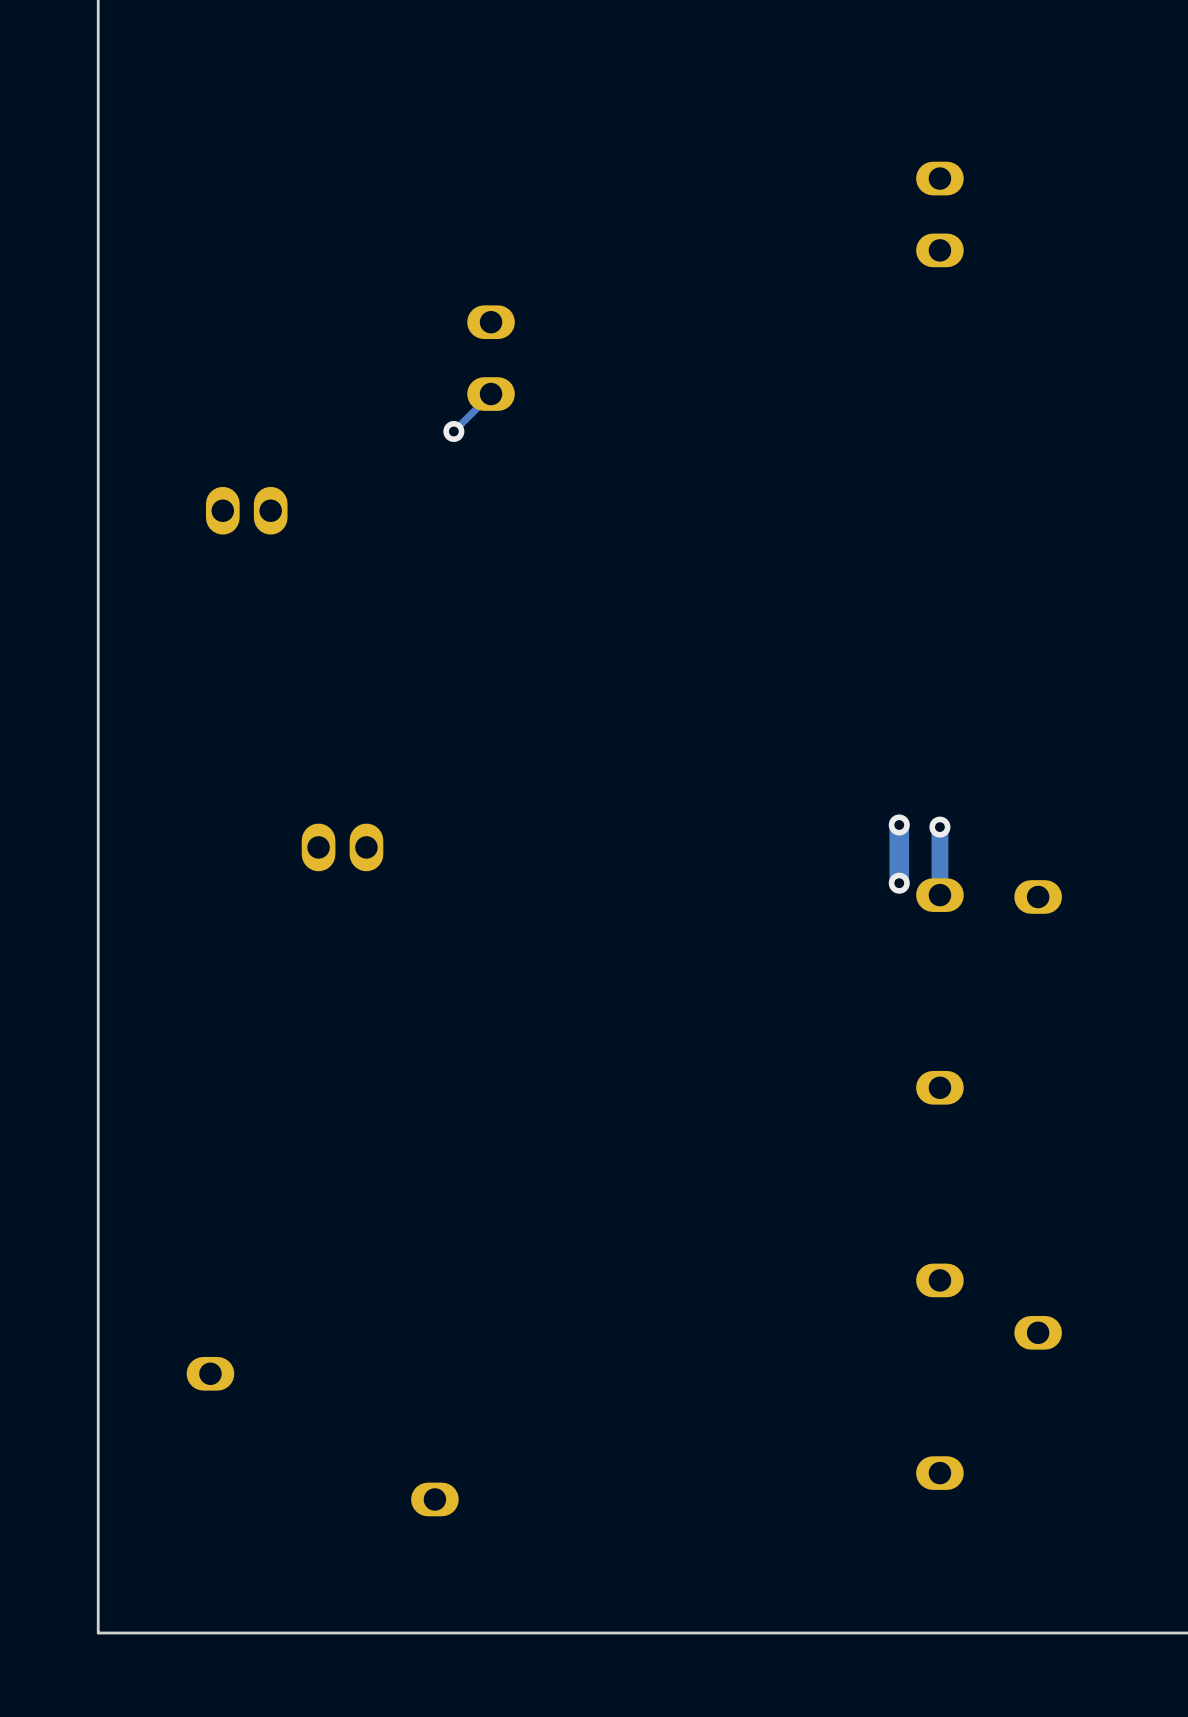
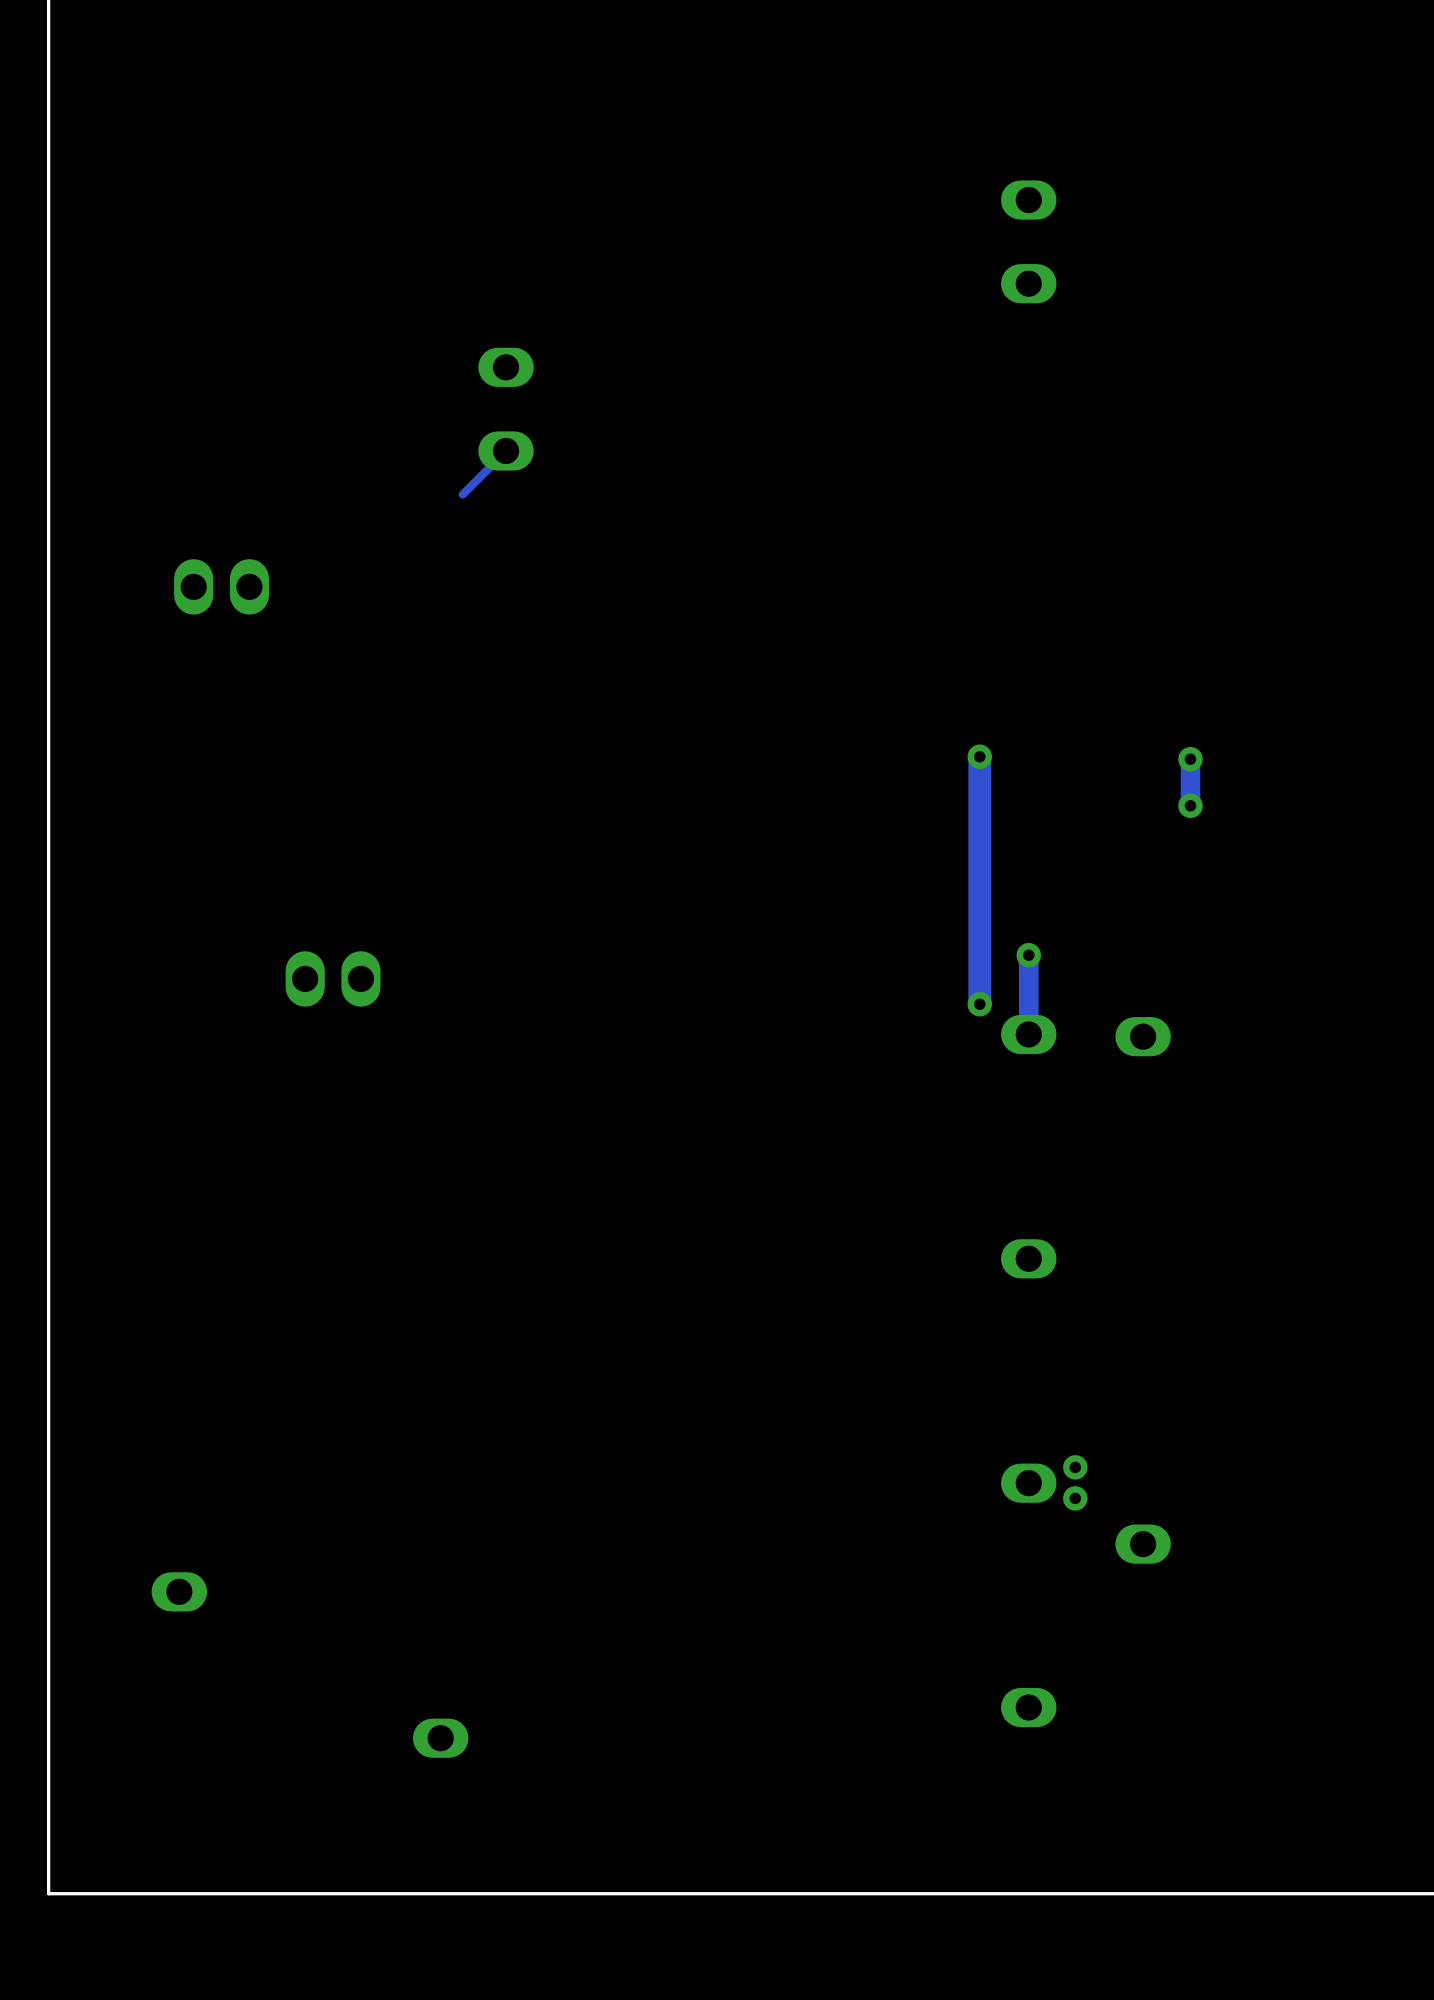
via: (453, 431) -> none
track: none -> (979, 756) (979, 1004)
via: none -> (979, 756)
track: none -> (1190, 759) (1190, 805)
via: none -> (1190, 759)
via: none -> (1190, 805)
track: (899, 824) (899, 883) -> none
via: (899, 824) -> none
via position: (899, 883) -> (979, 1004)
via: none -> (1075, 1467)
via: none -> (1075, 1498)

